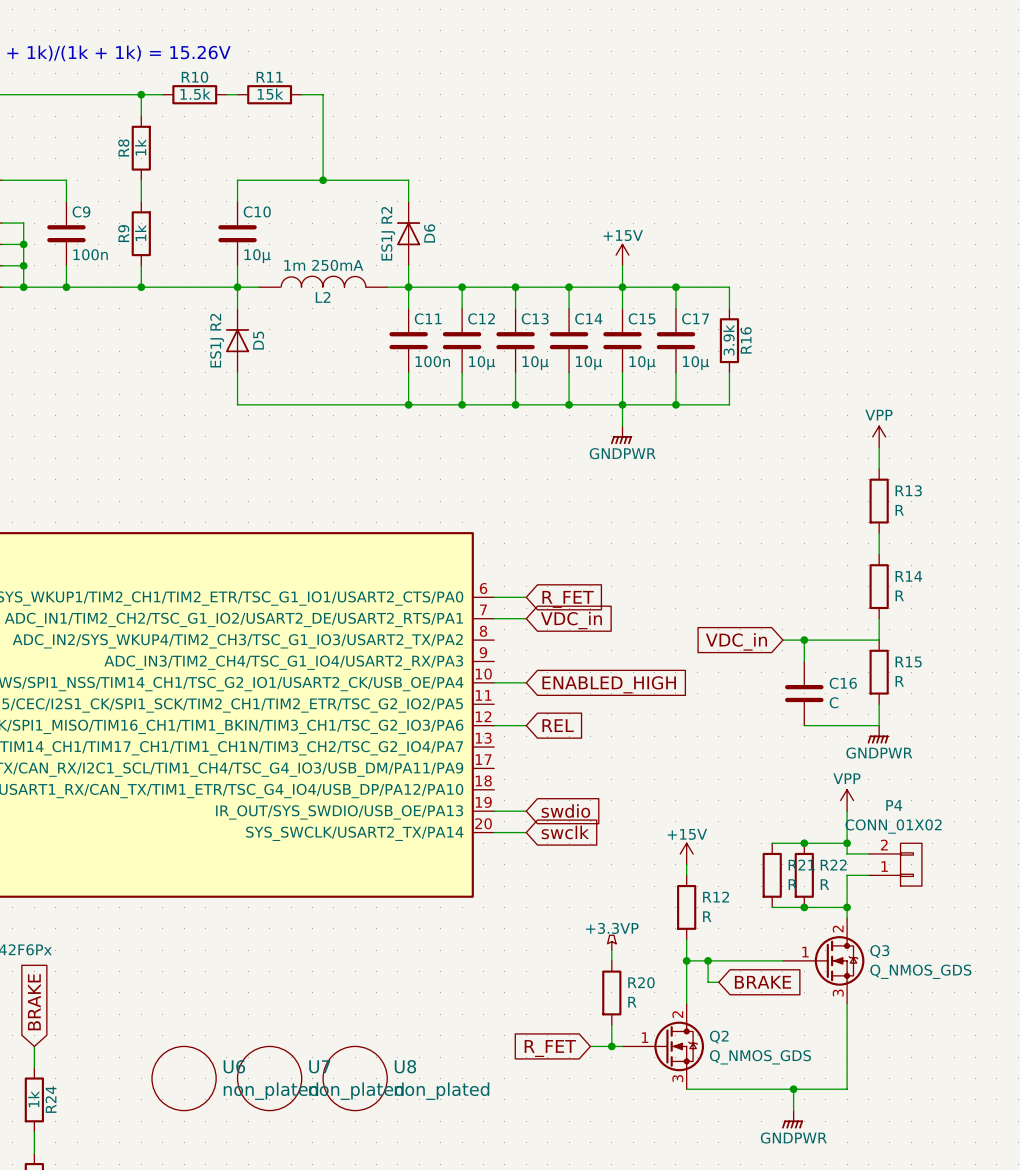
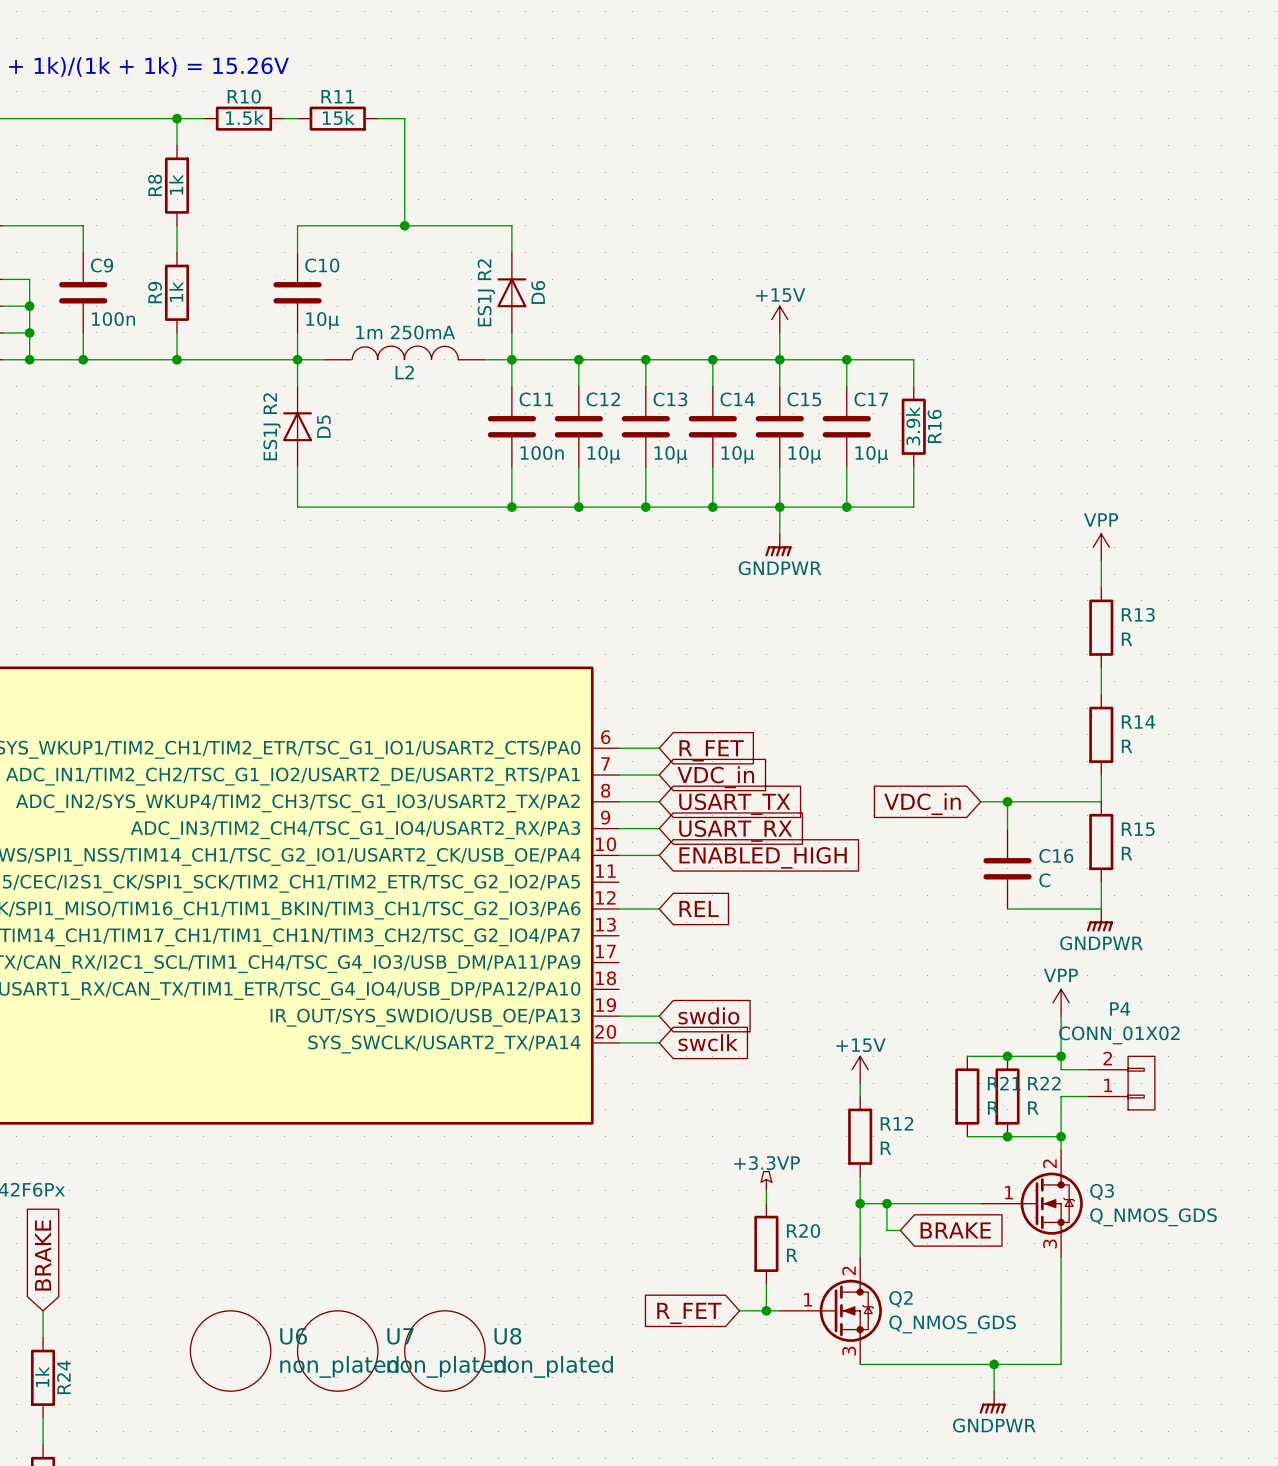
wire: none -> (619, 801) (659, 801)
global label: none -> USART_TX (734, 804)
wire: none -> (619, 828) (659, 828)
global label: none -> USART_RX (735, 831)

